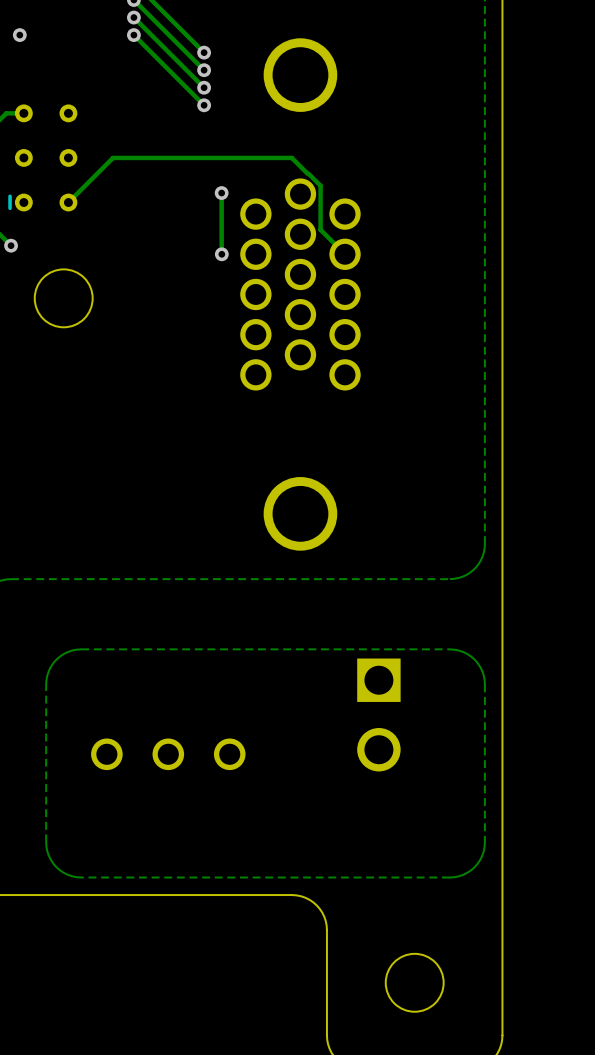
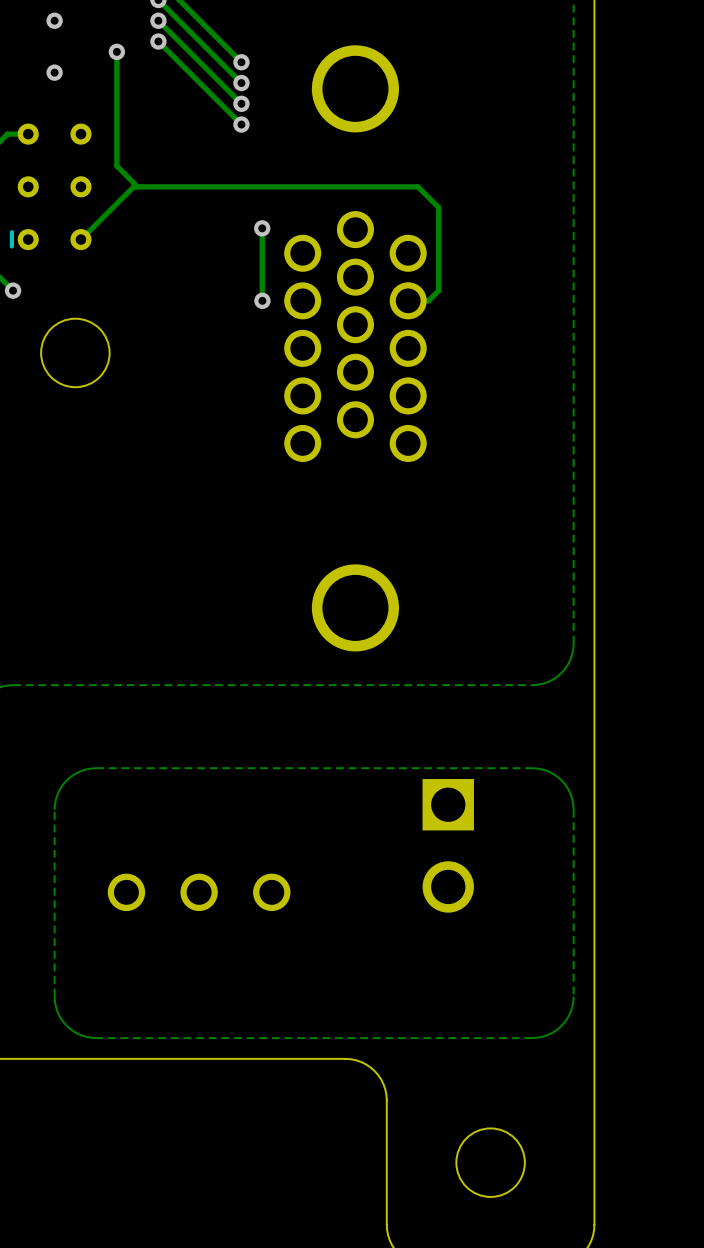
via: none -> (54, 20)
via: (19, 35) -> none
track: none -> (116, 51) (116, 166) (137, 186)
via: none -> (116, 51)
via: none -> (54, 72)
track: (291, 157) (320, 185) (320, 229) (345, 254) -> (345, 186) (417, 186) (438, 207) (438, 290) (428, 300) (408, 300)

